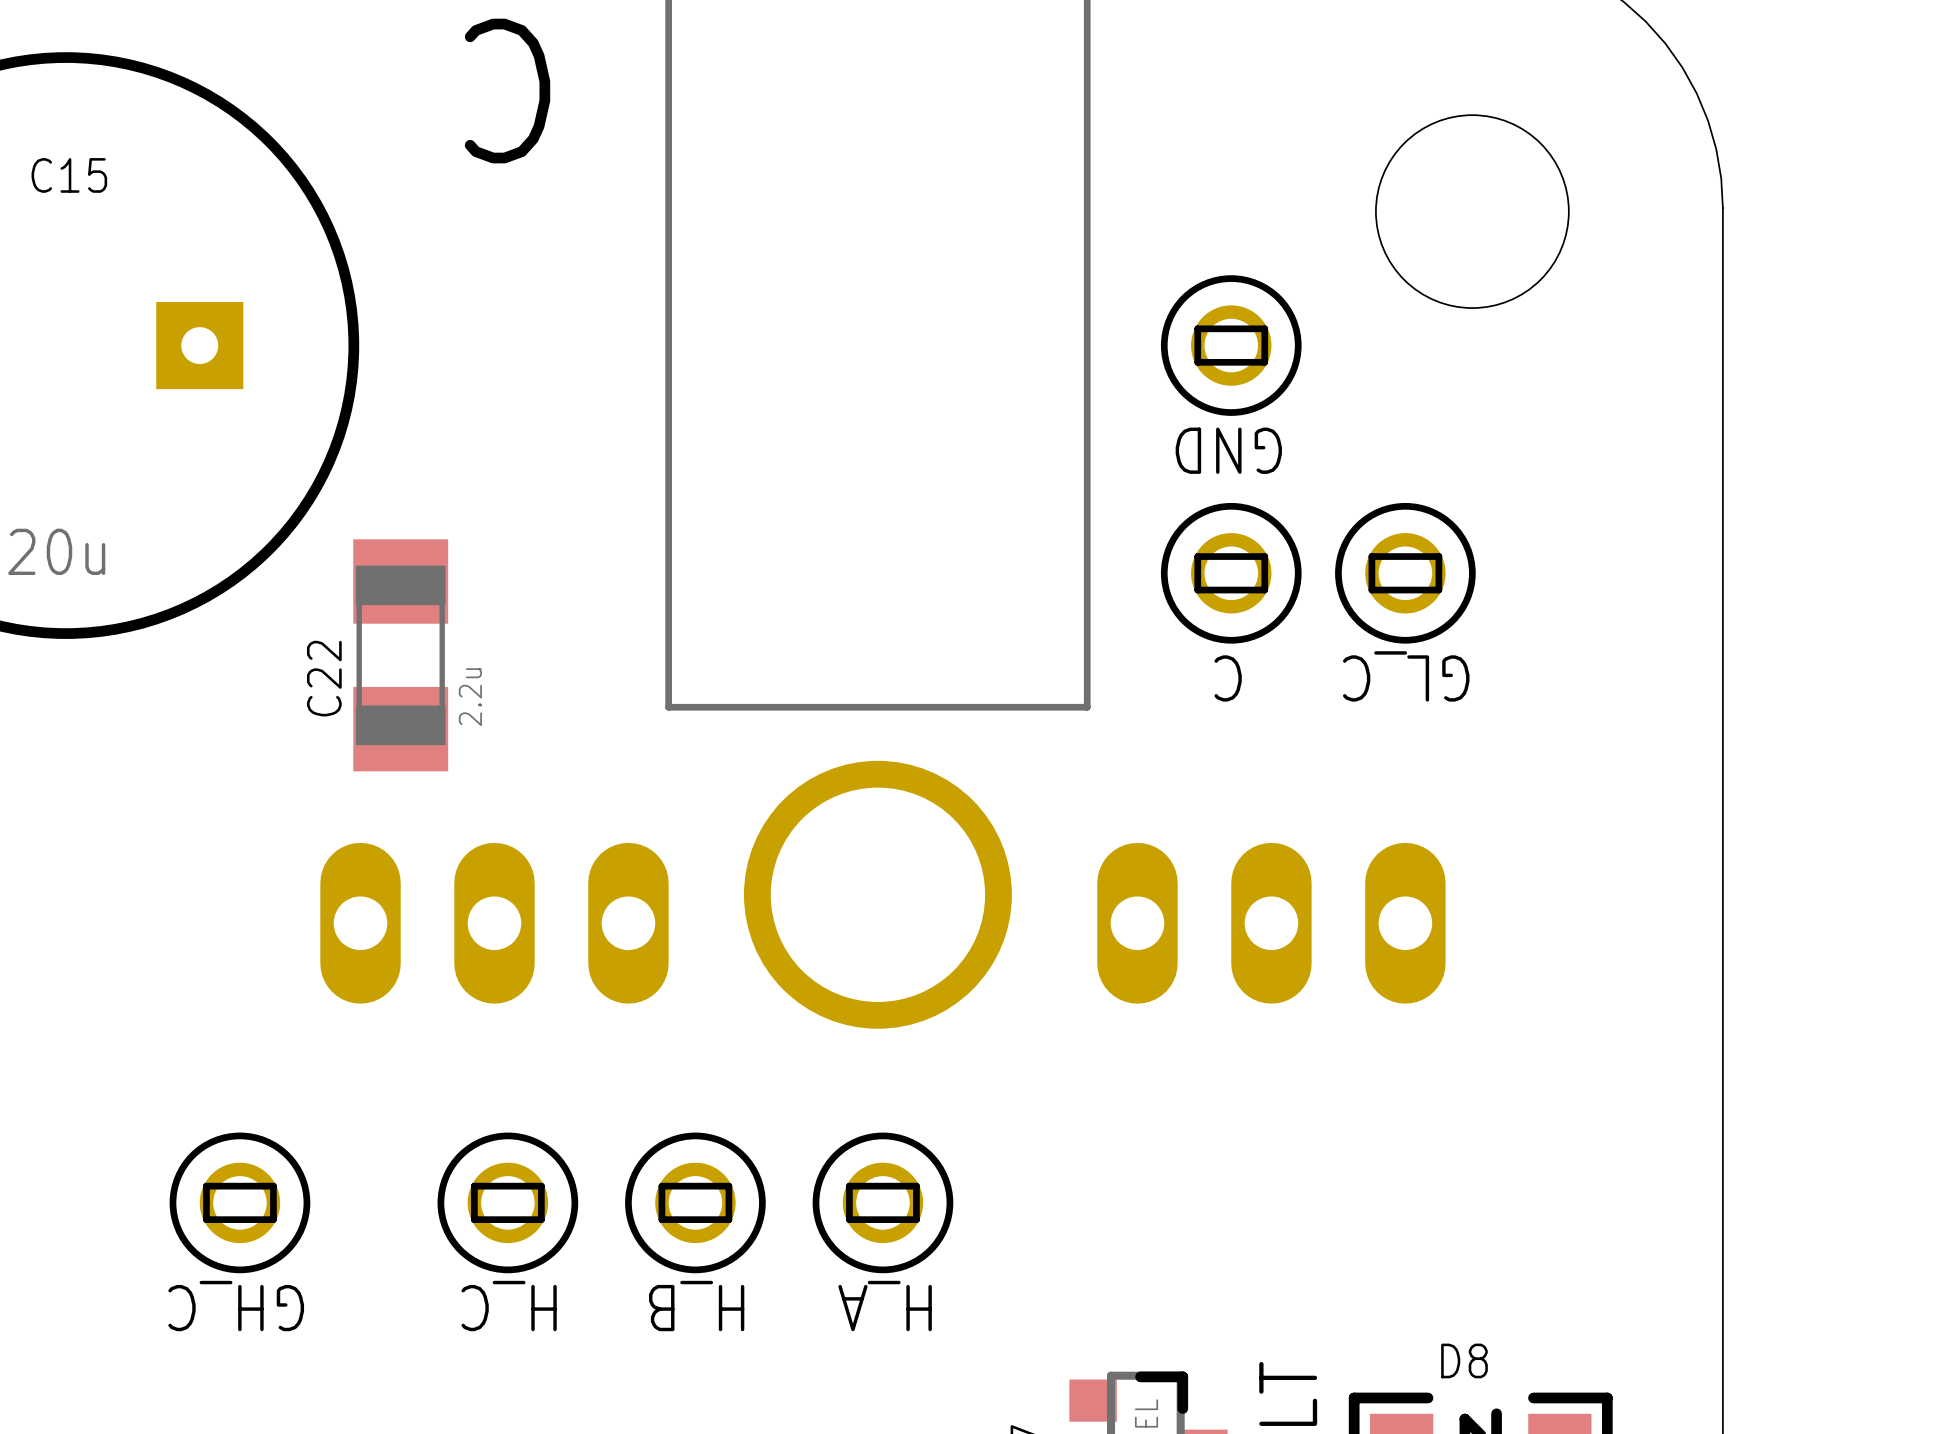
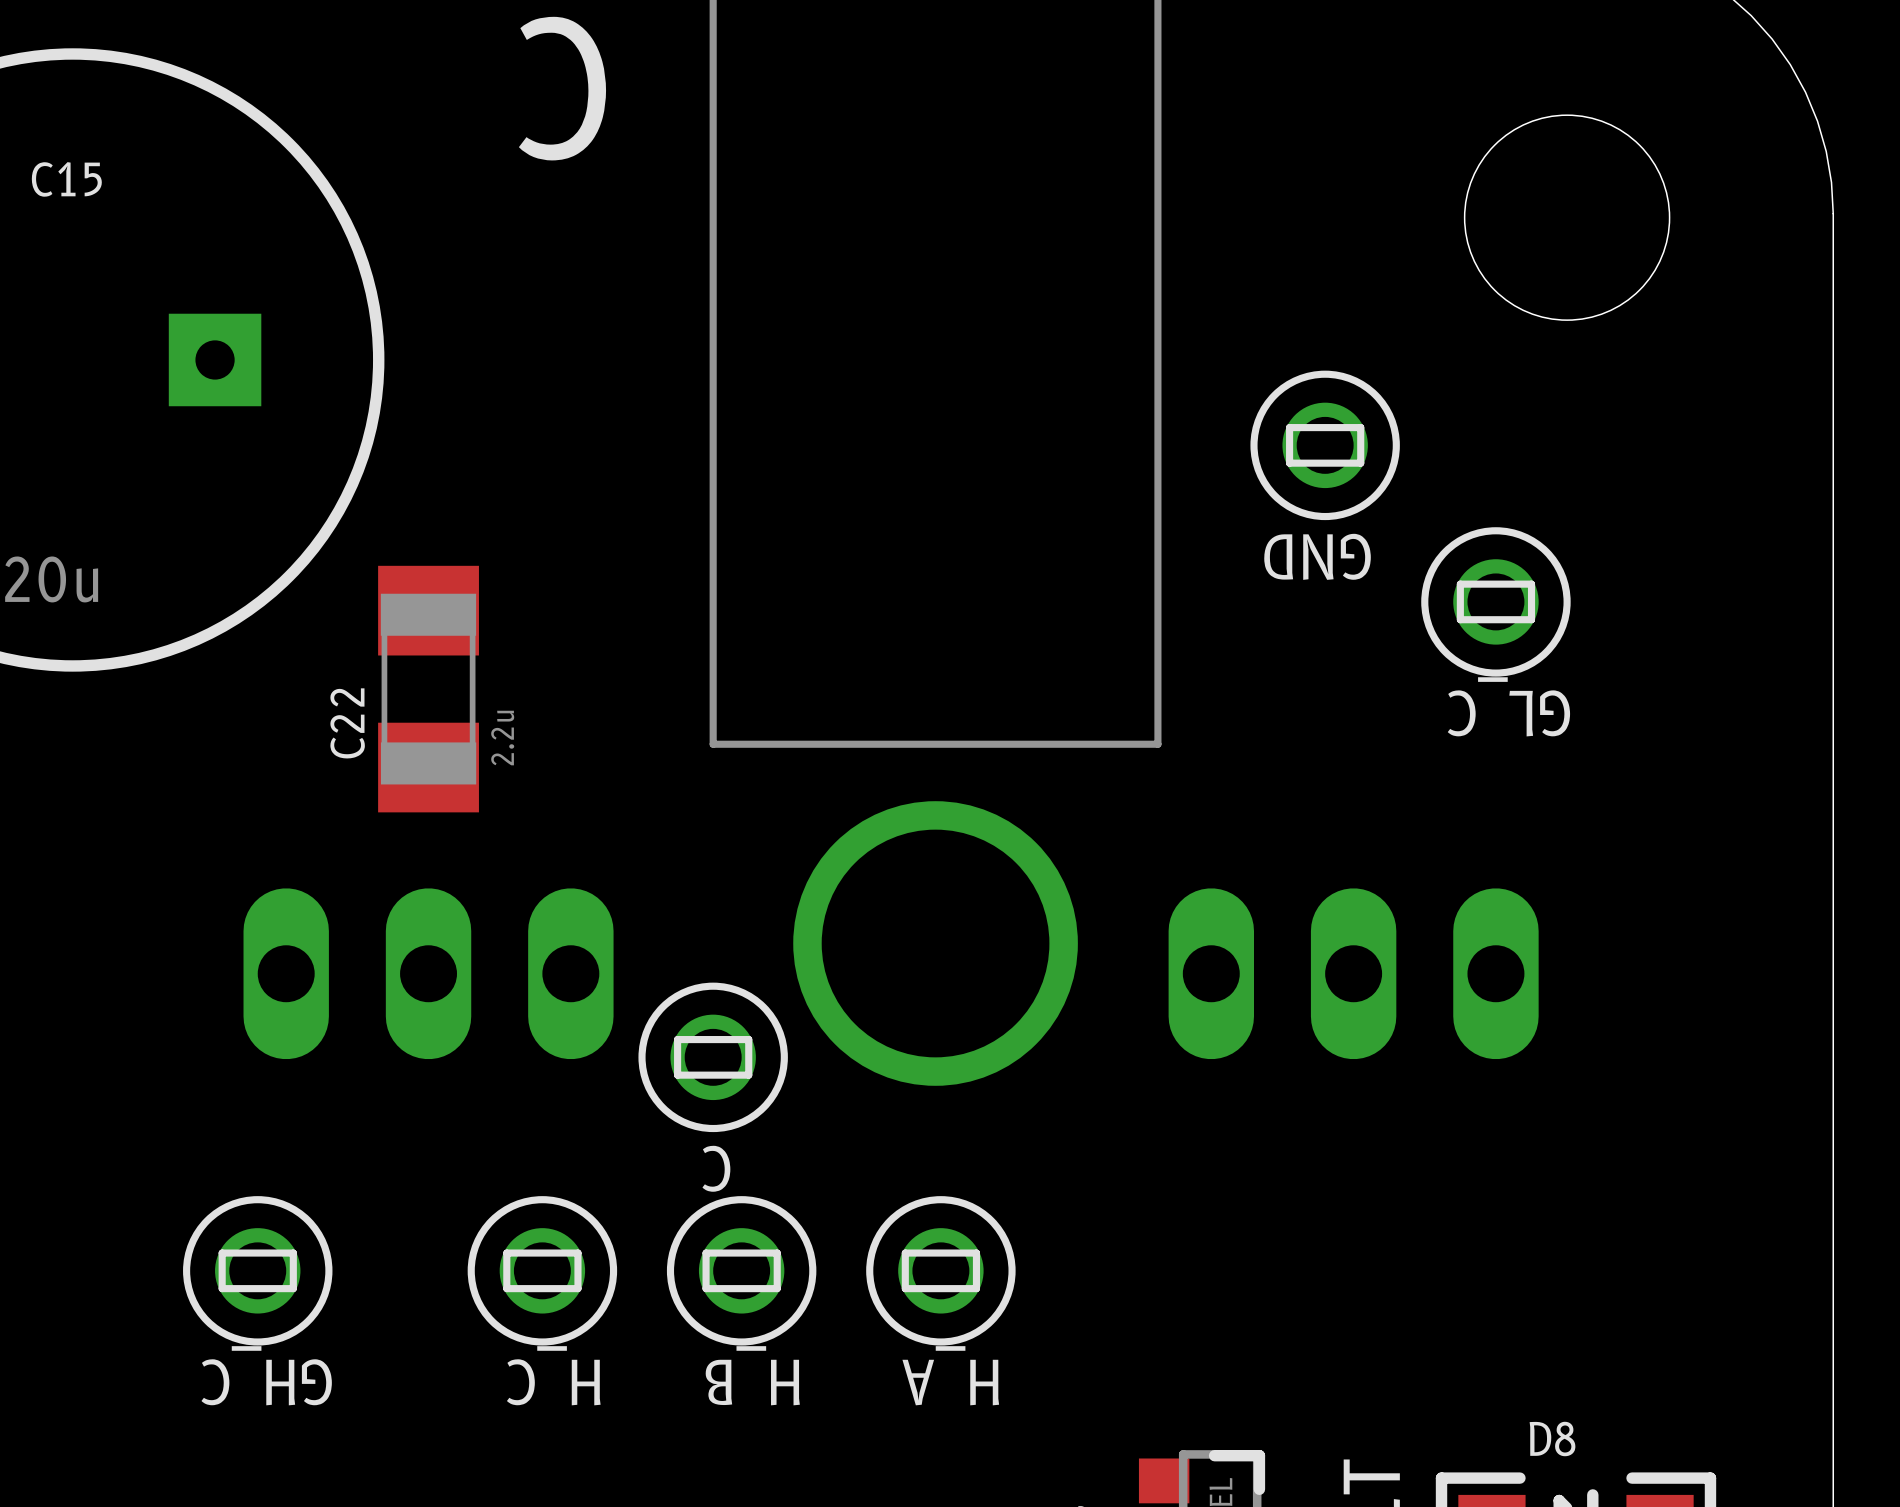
part: (1231, 345) -> none
part: none -> (1325, 445)
text position: GND (1228, 450) -> GND (1317, 556)
part: (1231, 573) -> none
text position: C (1228, 678) -> C (716, 1168)
part position: (494, 923) -> (428, 973)
part: none -> (713, 1057)

